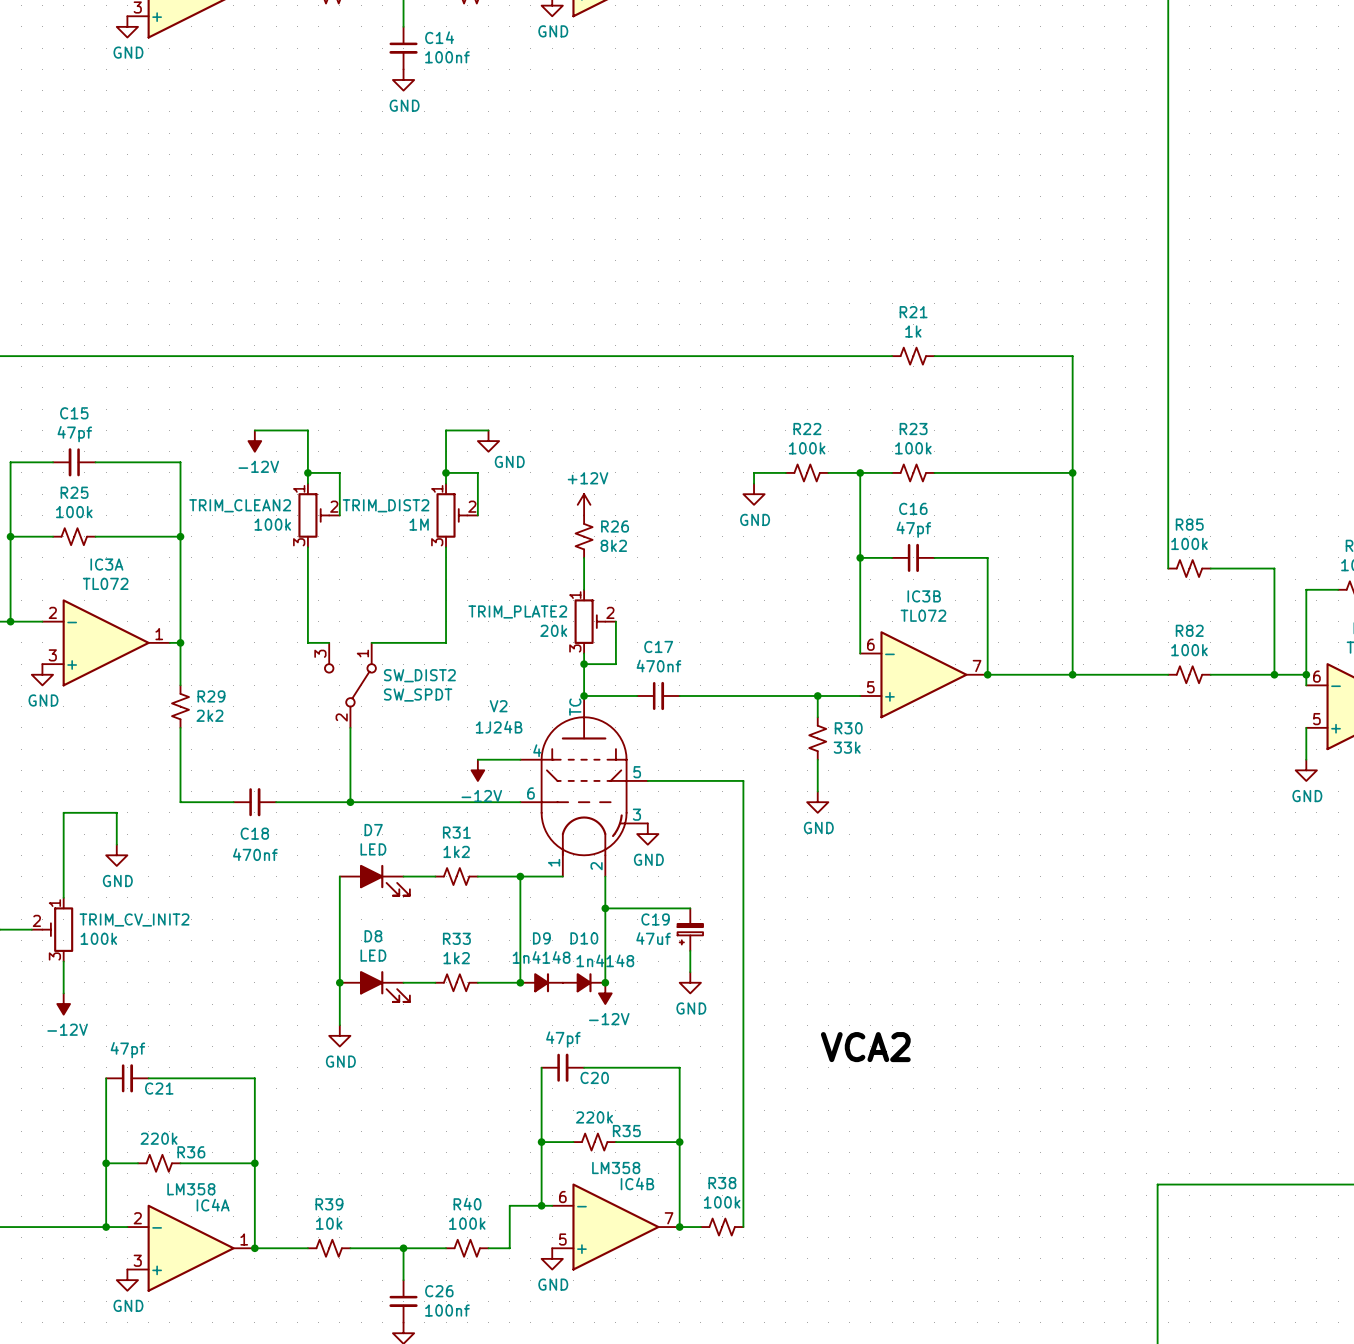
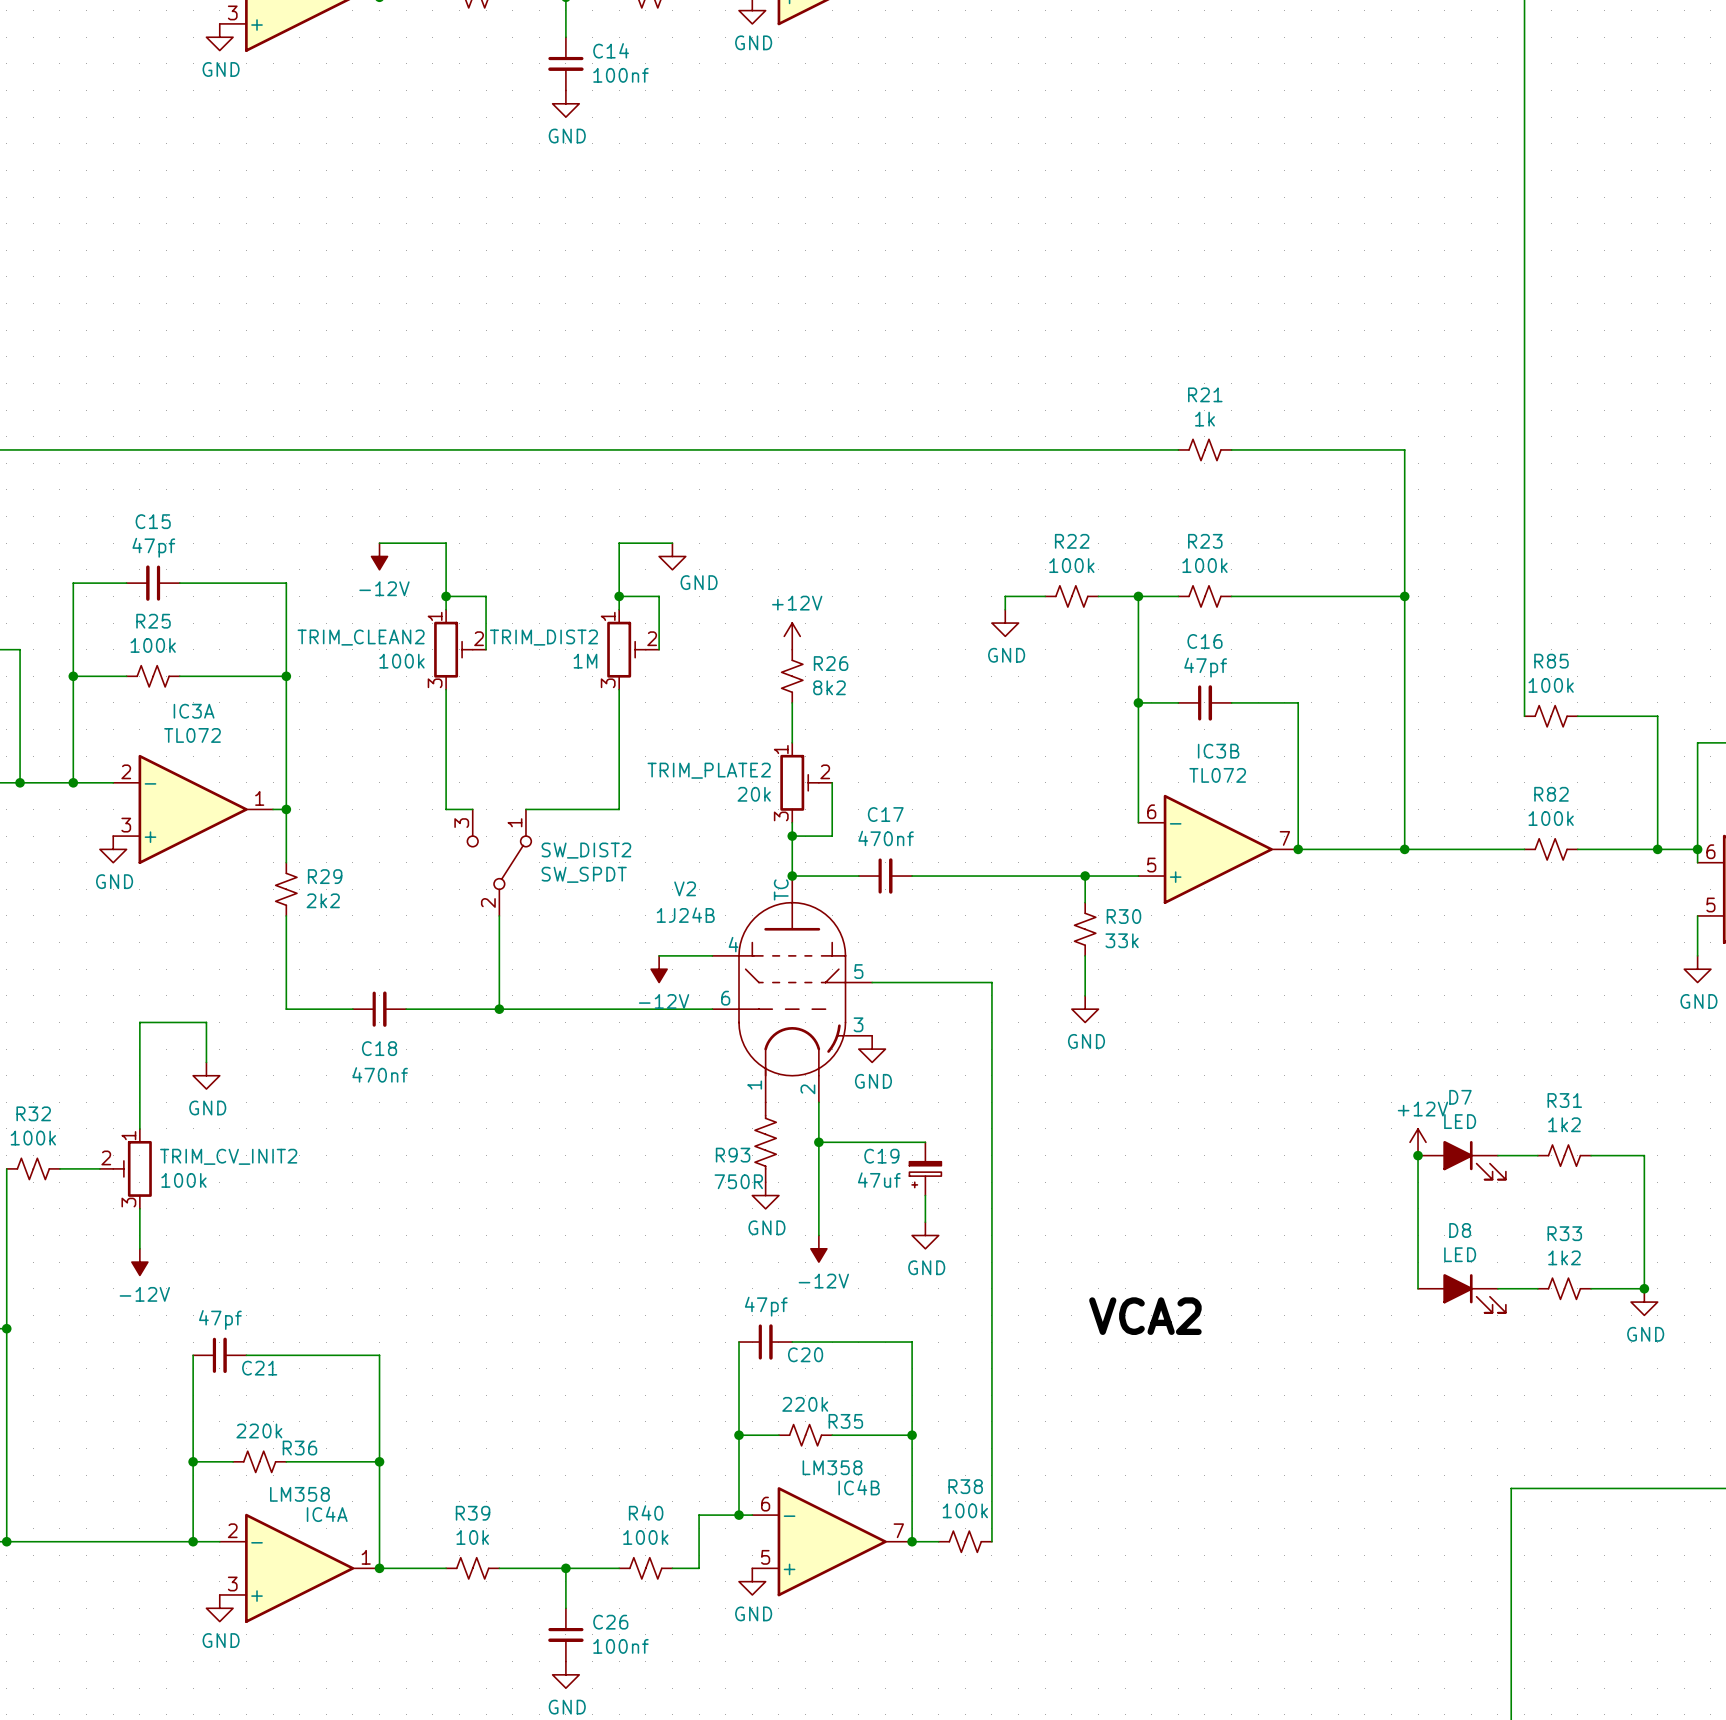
wire: (339, 876) (339, 1025) -> none
wire: (403, 876) (435, 876) -> none
R31 position: (456, 876) -> (1564, 1155)
wire: (477, 876) (562, 876) -> none
wire: (520, 876) (520, 982) (477, 982) -> none
junction: (520, 876) -> none
D7 position: (374, 880) -> (1461, 1160)
R93: none -> 750R (765, 1142)
power symbol: none -> +12V (1418, 1142)
wire: none -> (1418, 1155) (1418, 1288)
junction: none -> (1418, 1155)
wire: none -> (1497, 1155) (1537, 1155)
wire: none -> (1591, 1155) (1644, 1155) (1644, 1288) (1591, 1288)
power symbol: none -> GND (765, 1195)
junction: (339, 982) -> none
wire: (403, 982) (435, 982) -> none
R33 position: (456, 982) -> (1564, 1288)
junction: (520, 982) -> none
D9: 1n4148 (541, 982) -> none
D10: 1n4148 (584, 982) -> none
junction: (605, 982) -> none
D8 position: (374, 986) -> (1461, 1293)
wire: none -> (1497, 1288) (1537, 1288)
junction: none -> (1644, 1288)
power symbol: GND (339, 1035) -> none
power symbol: none -> GND (1644, 1302)

